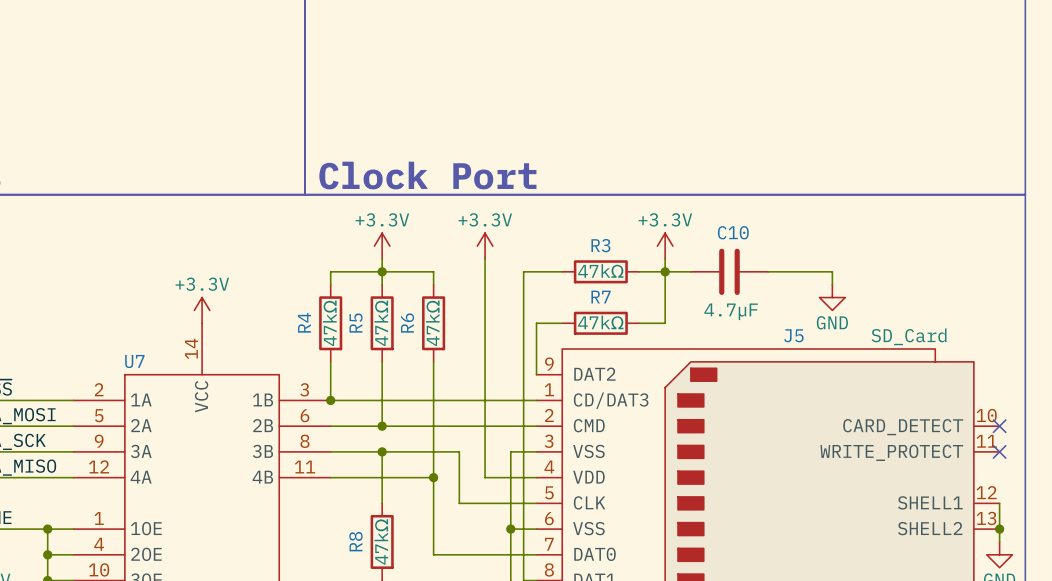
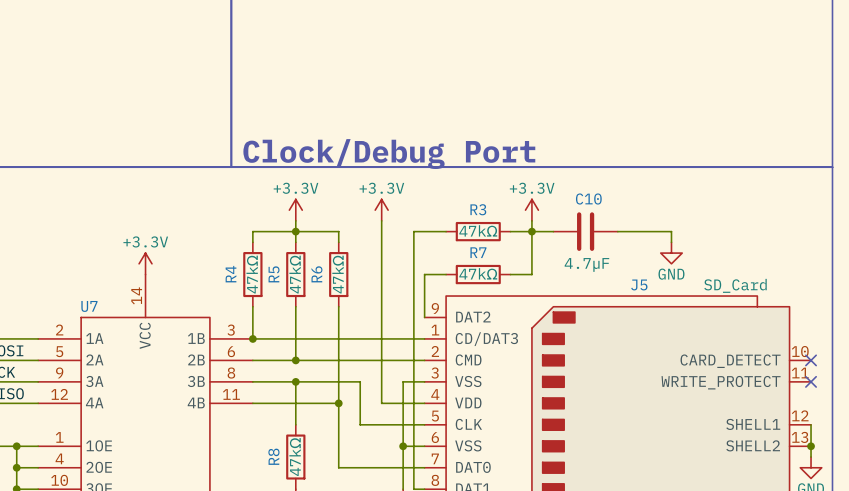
text: Clock Port (427, 175) -> Clock/Debug Port (389, 154)

